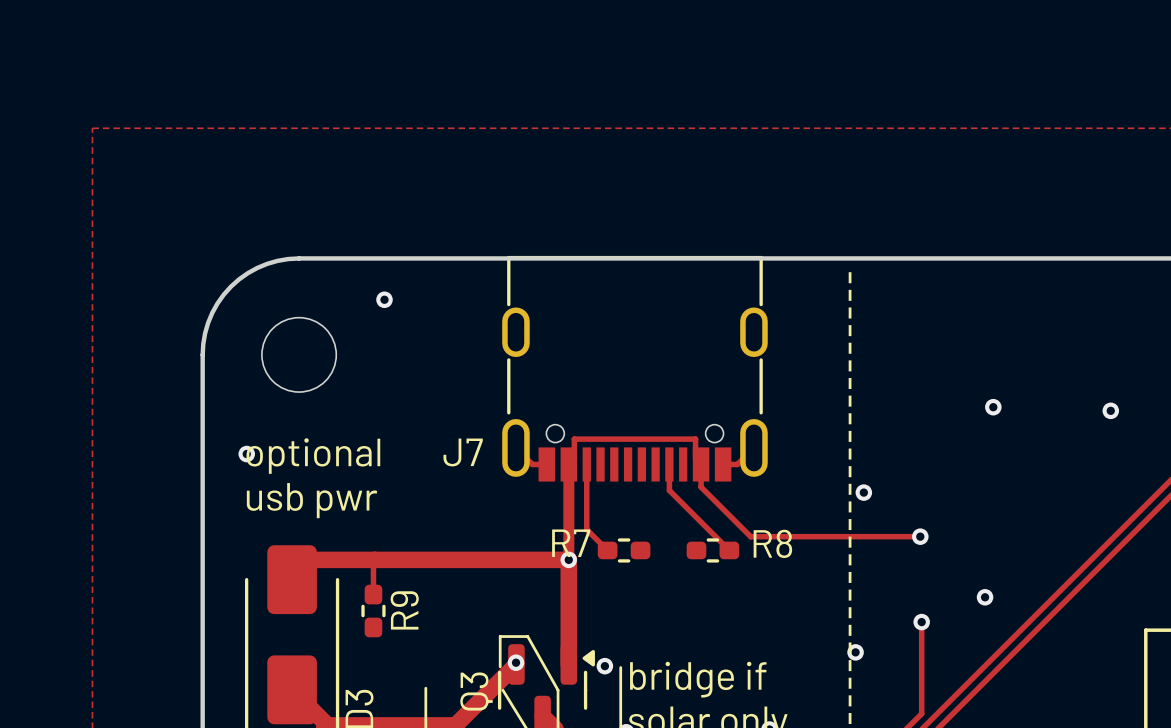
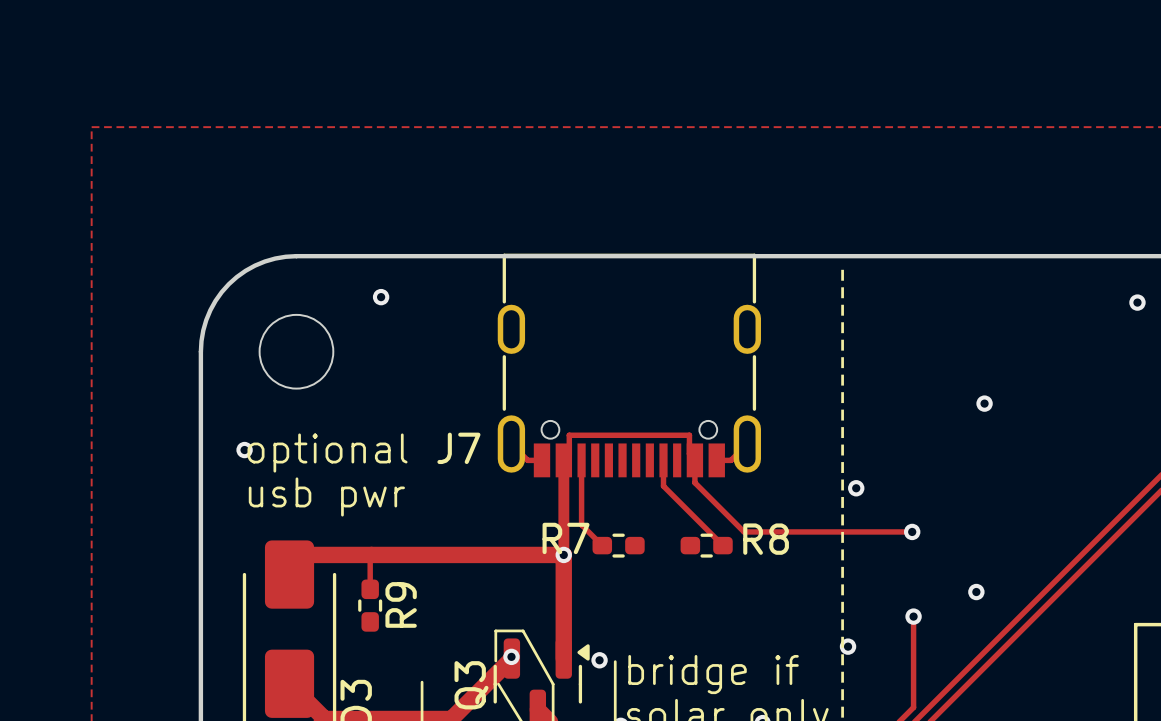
via position: (1110, 410) -> (1137, 302)

